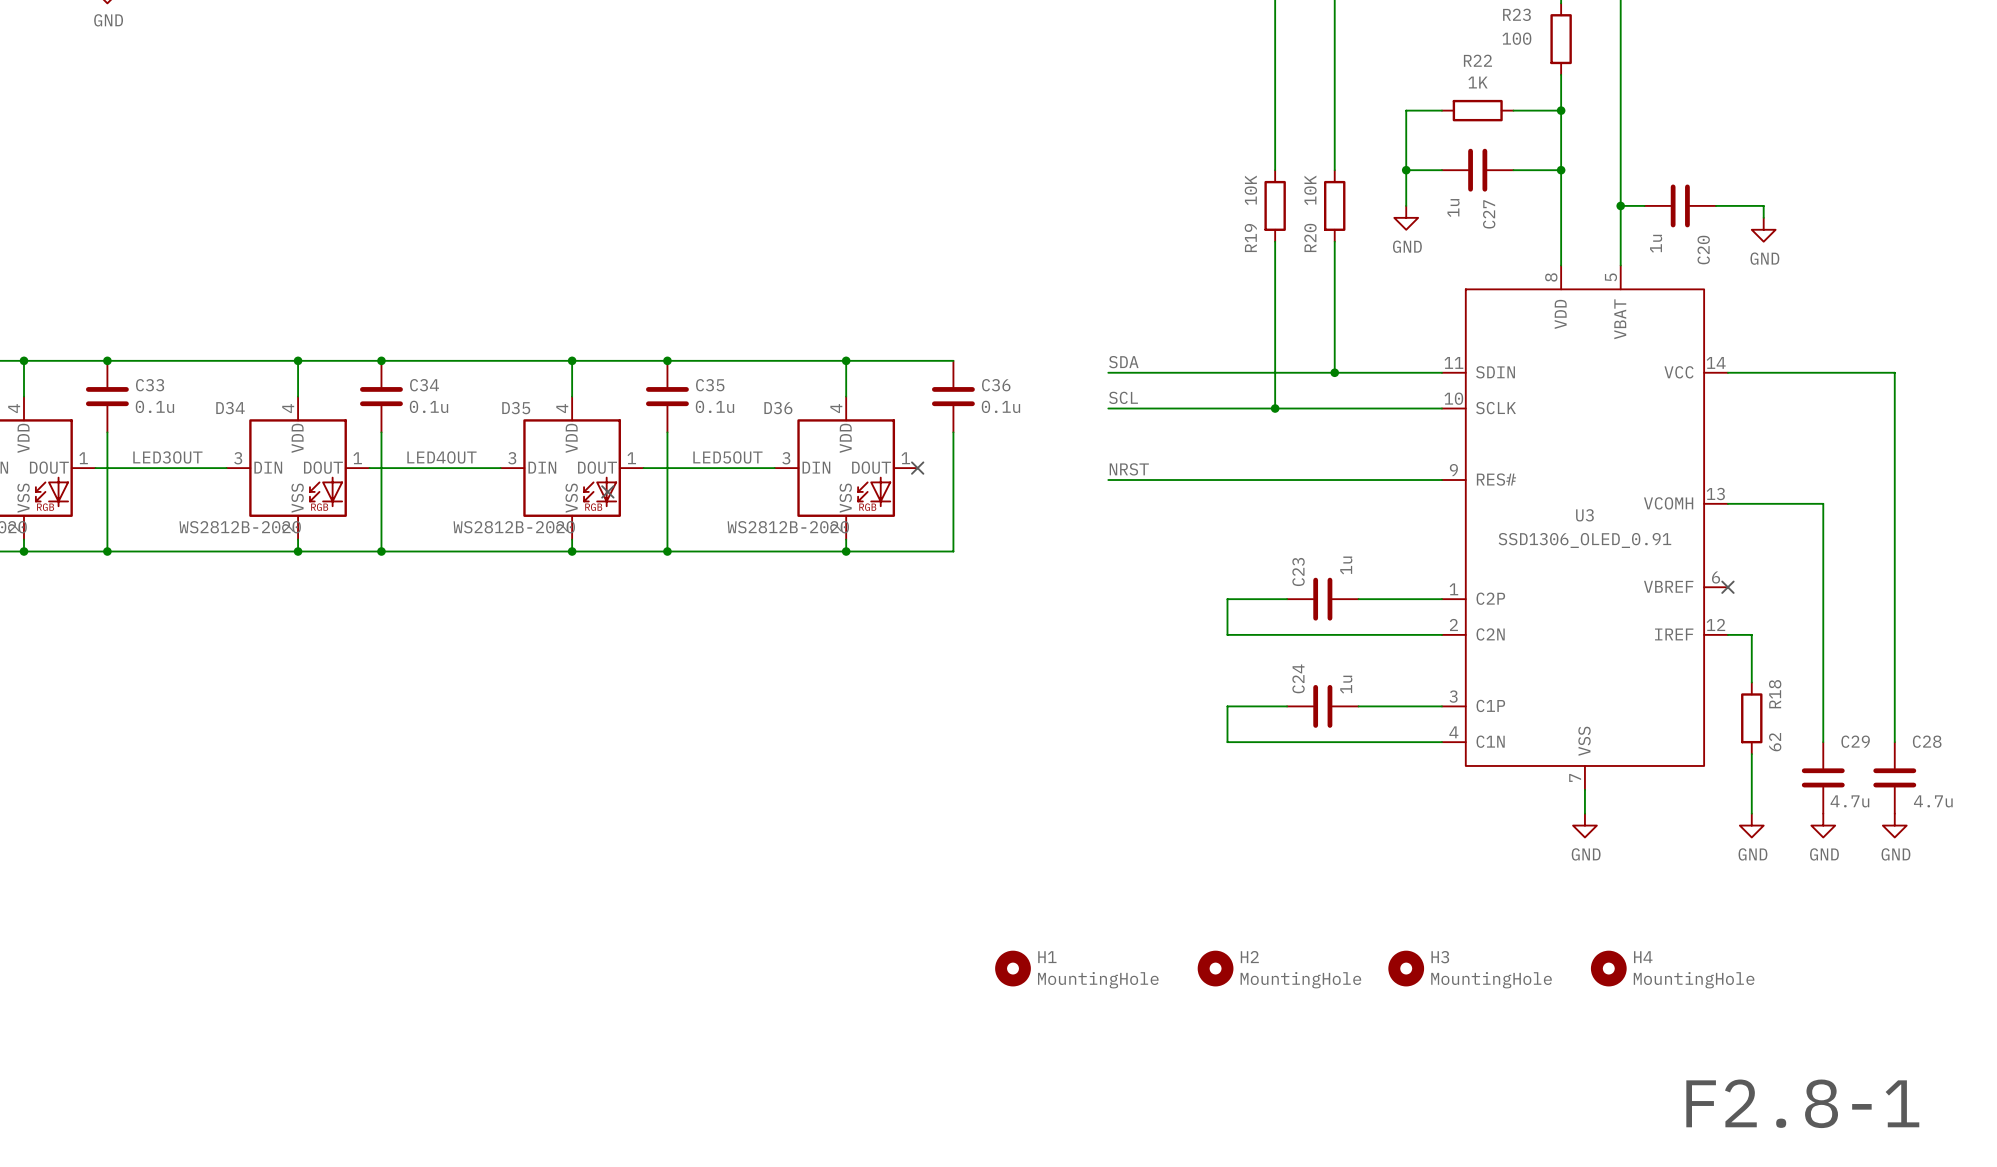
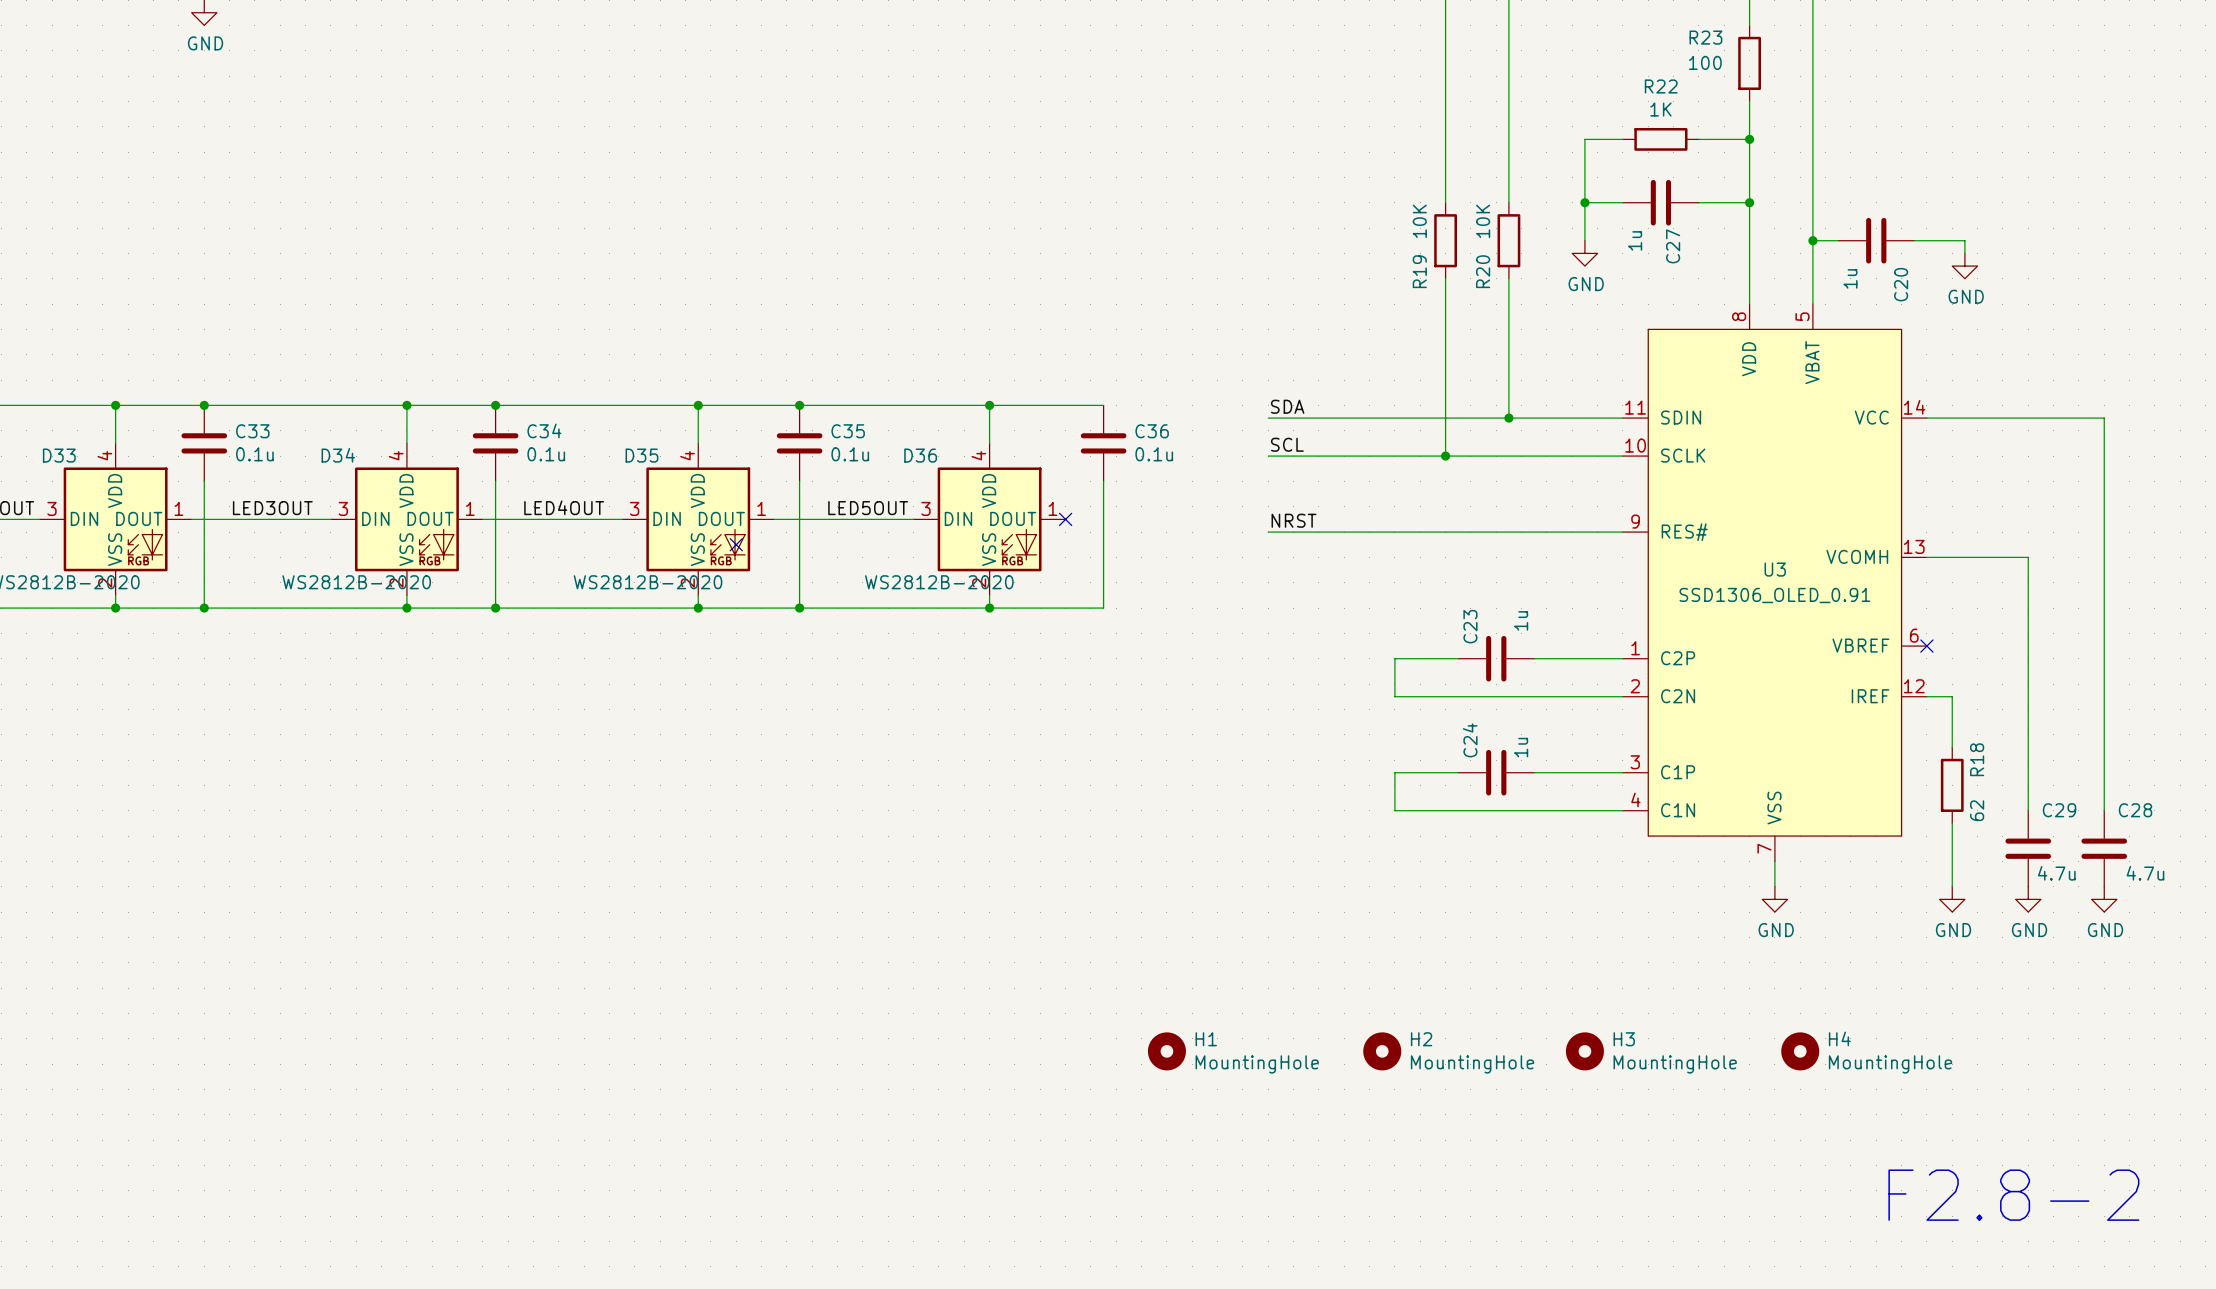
text: F2.8-1 (1802, 1103) -> F2.8-2 (2013, 1195)

